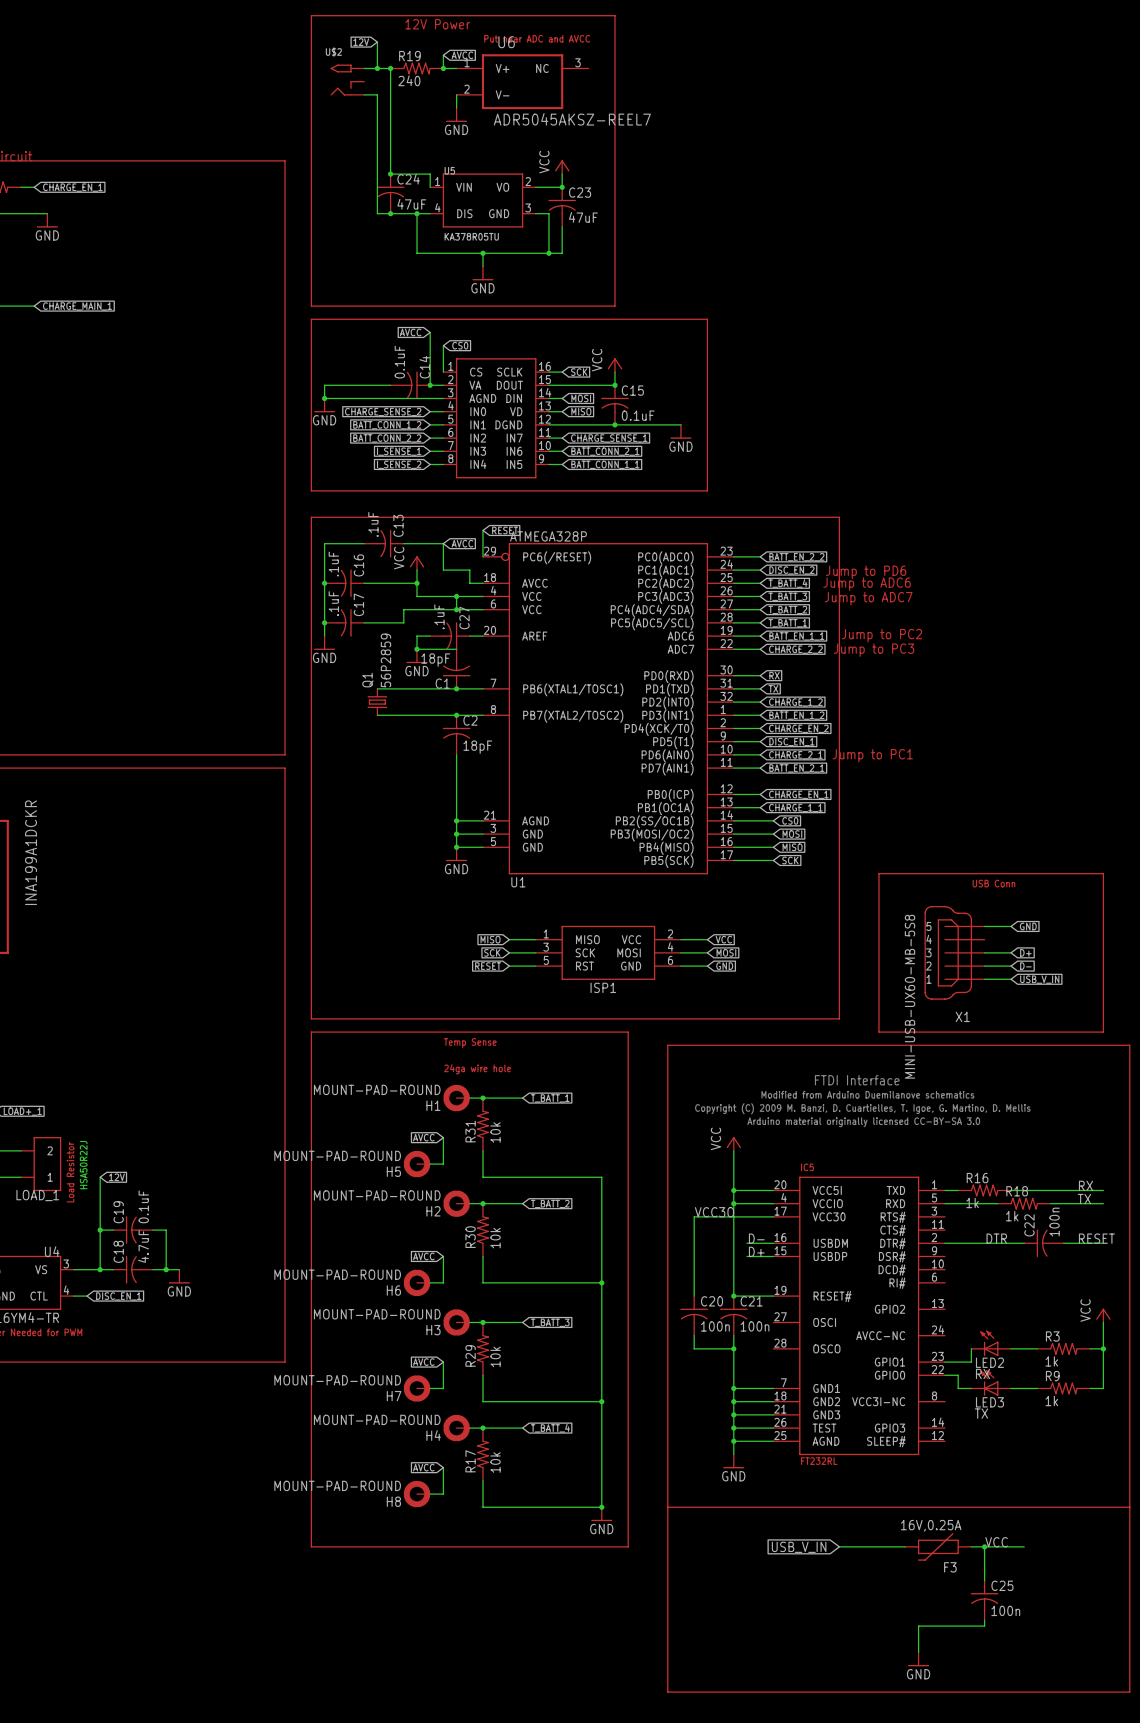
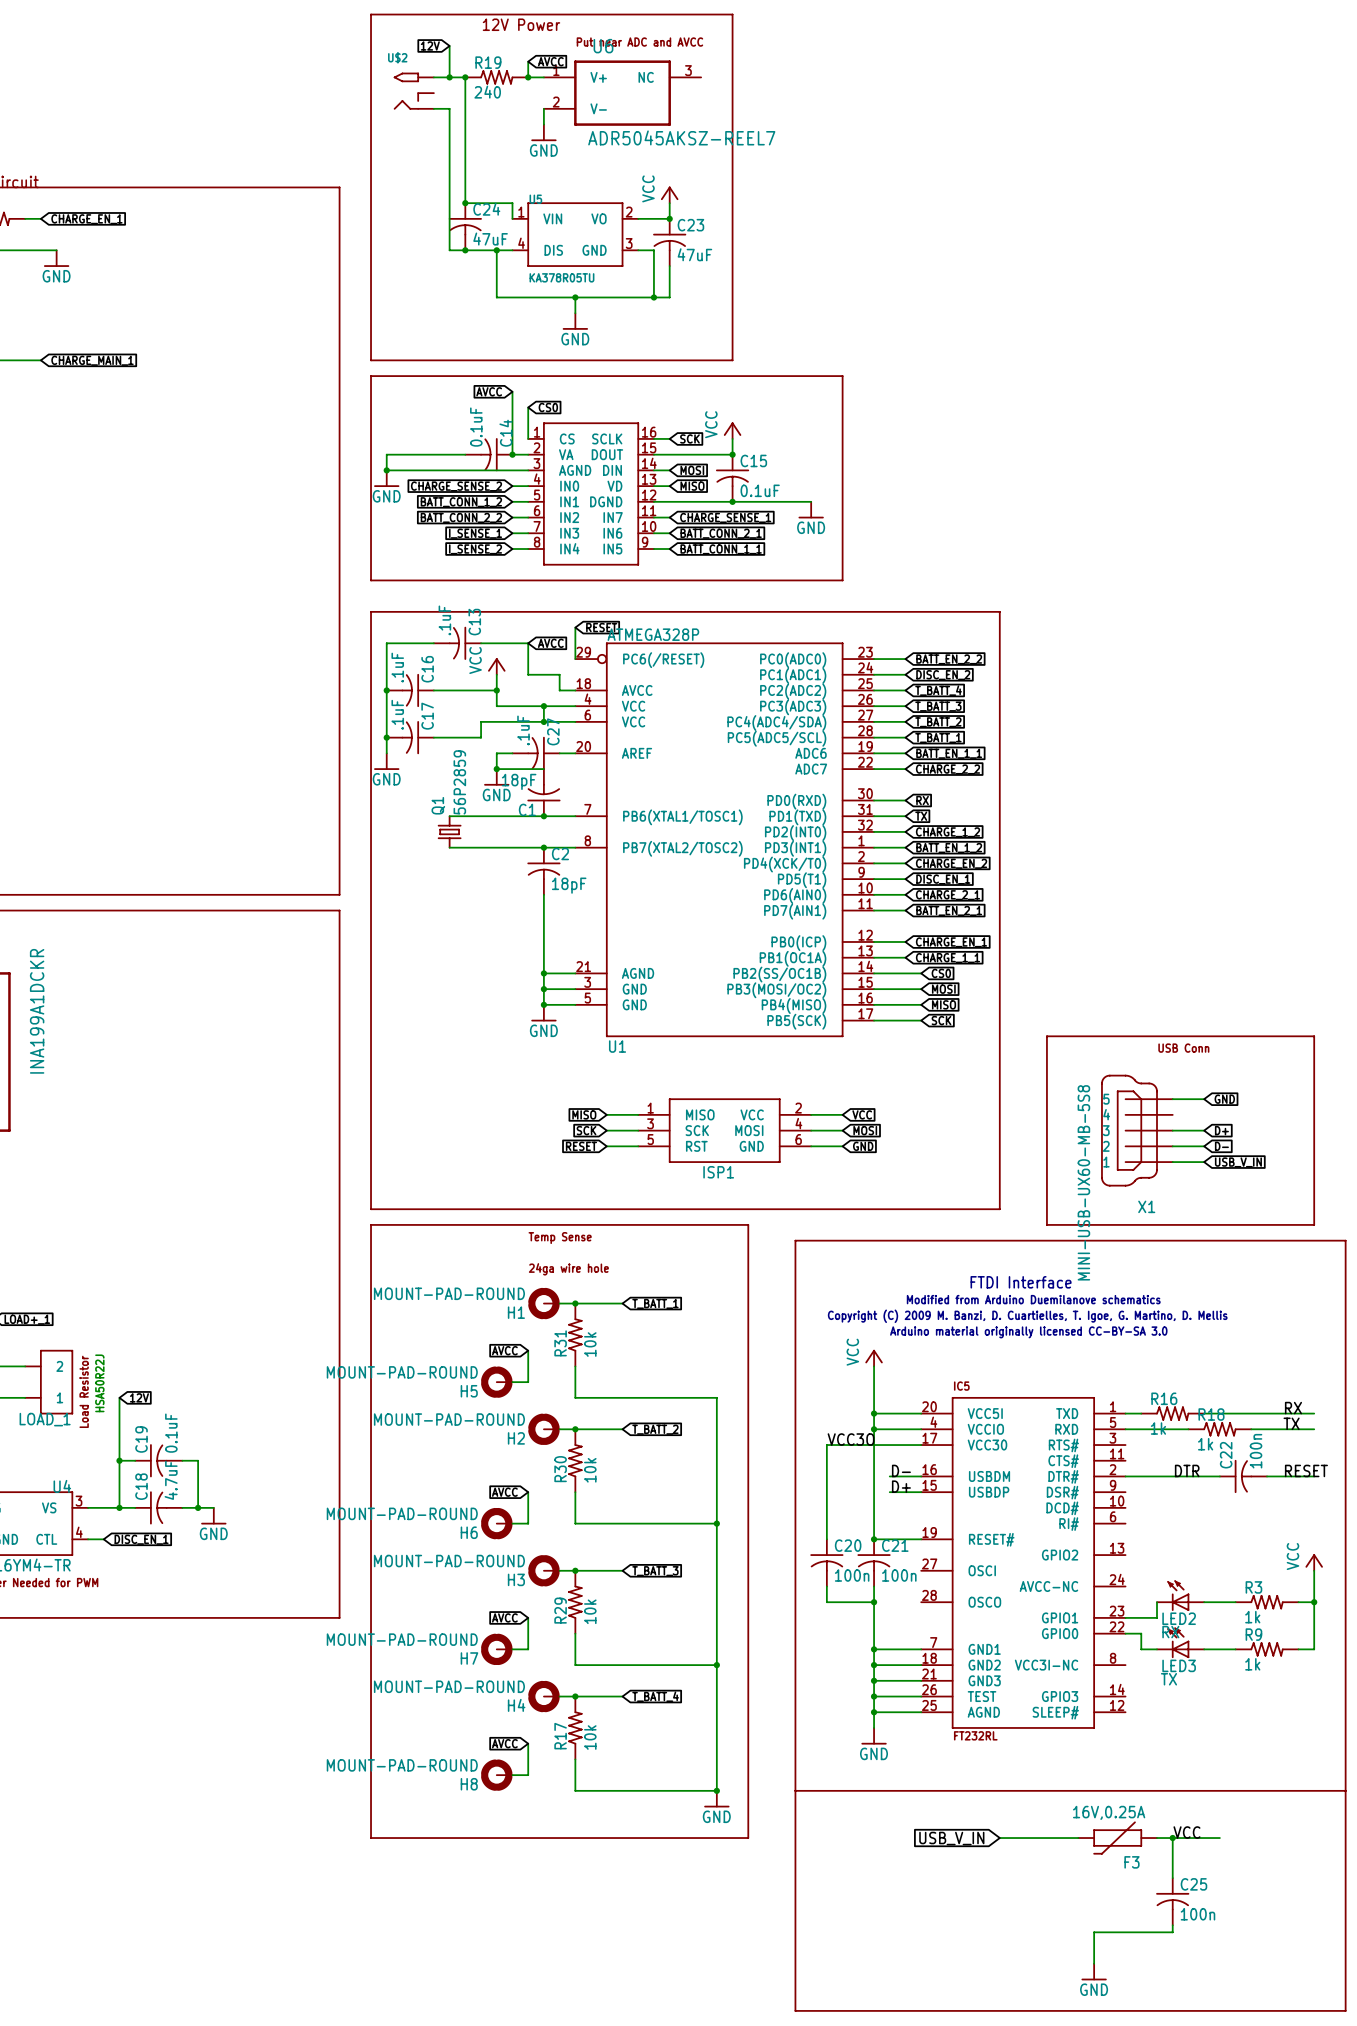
text: Jump to PD6 (866, 572) -> none
text: Jump to ADC6 (867, 584) -> none
text: Jump to ADC7 (868, 598) -> none
text: Jump to PC2 (881, 635) -> none
text: Jump to PC3 (874, 650) -> none
text: Jump to PC1 (872, 755) -> none

